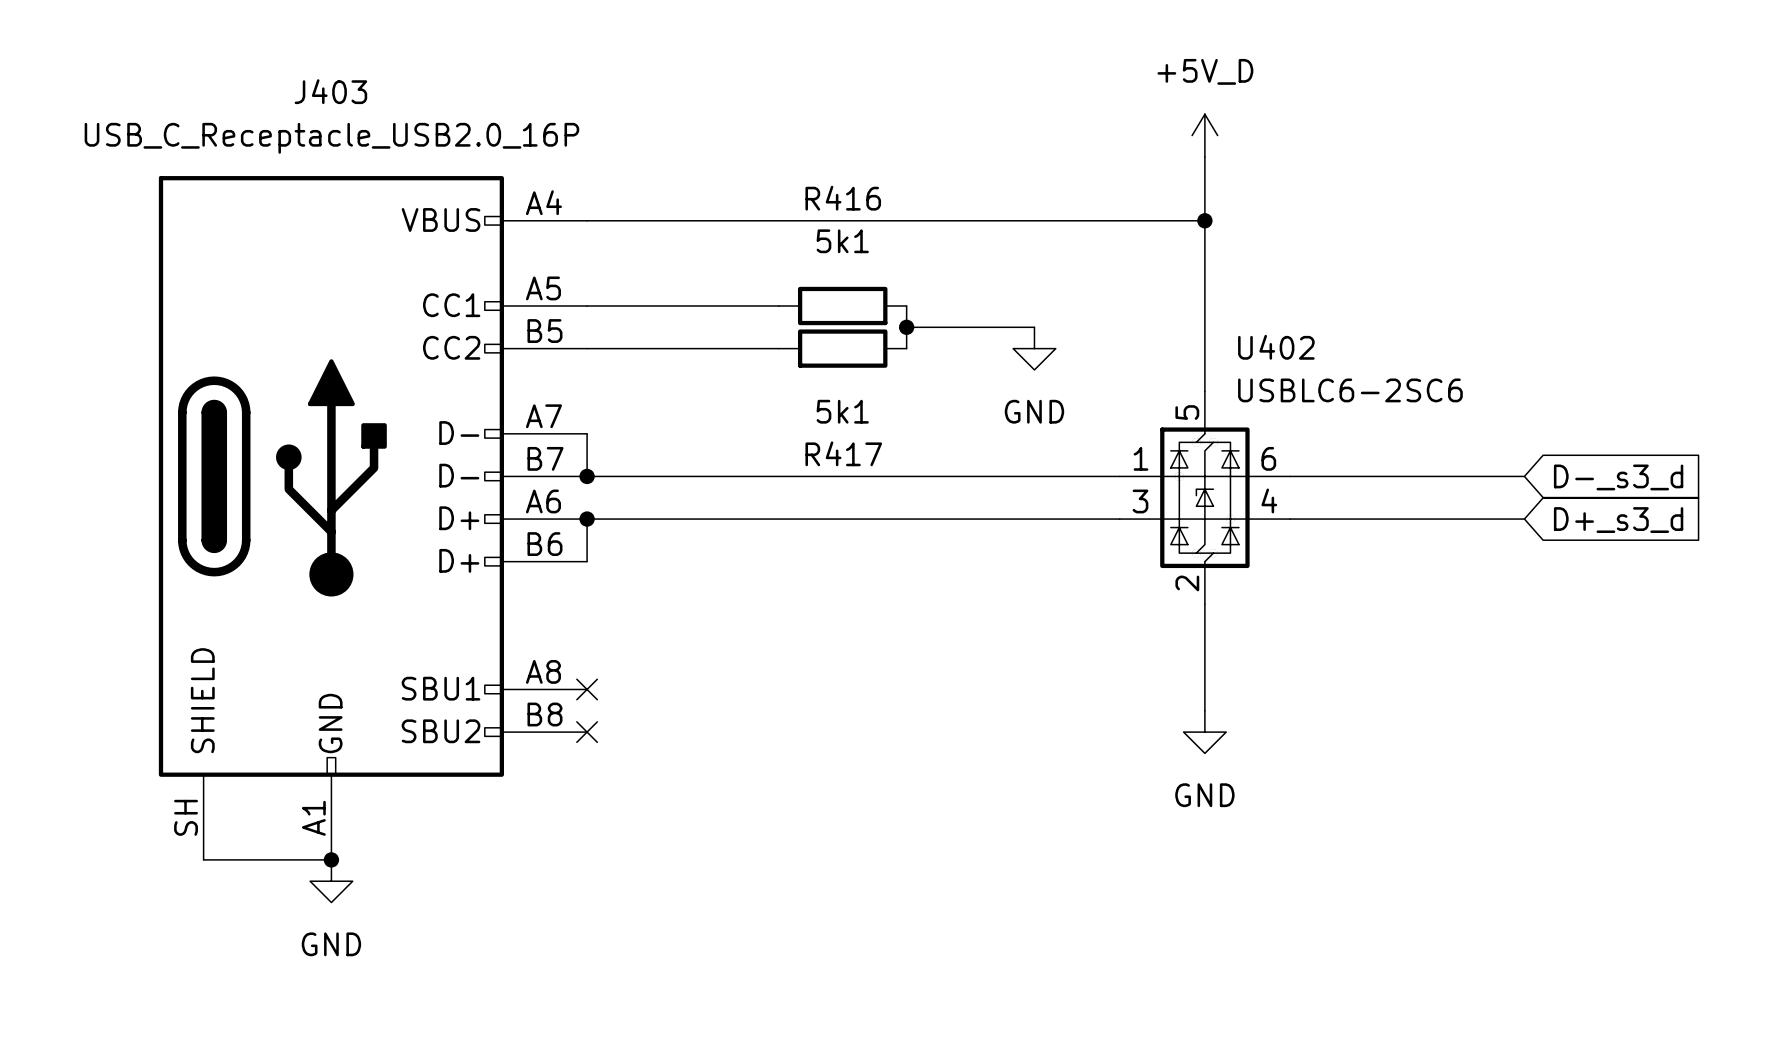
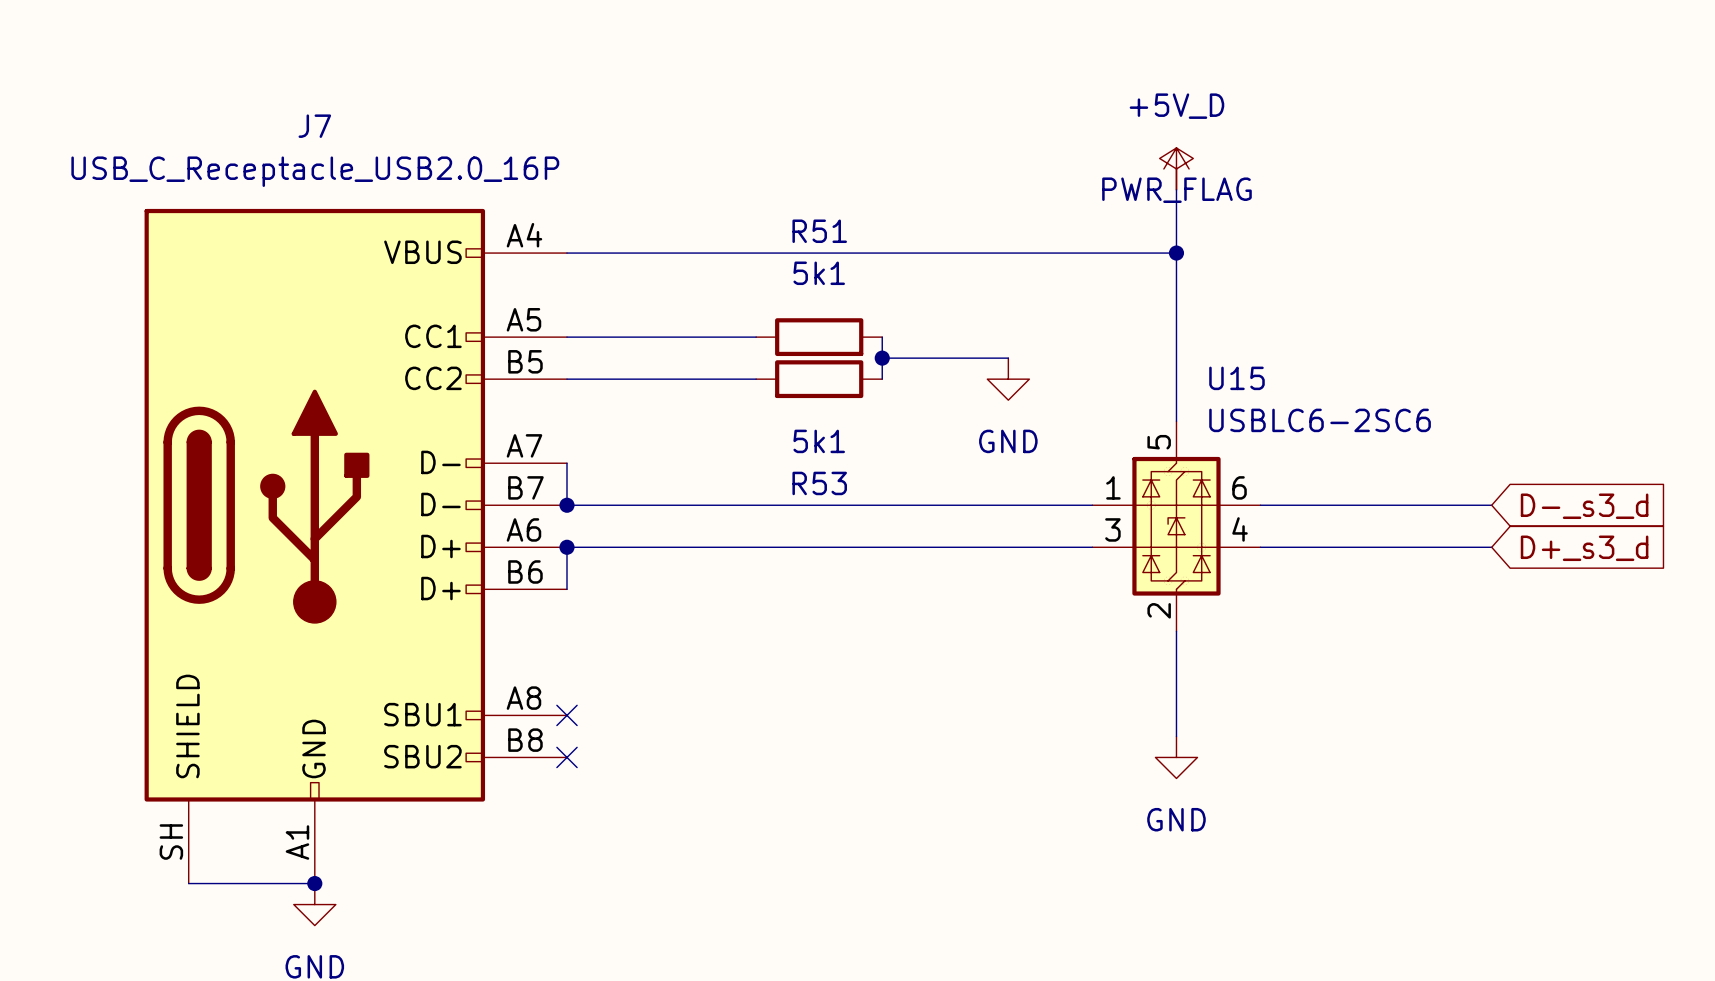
J403 name: J403 (330, 91) -> J7 (314, 126)
power symbol: none -> PWR_FLAG (1176, 168)
R416 name: R416 (843, 198) -> R51 (819, 231)
U402 name: U402 (1276, 347) -> U15 (1236, 378)
R417 name: R417 (843, 453) -> R53 (819, 483)

